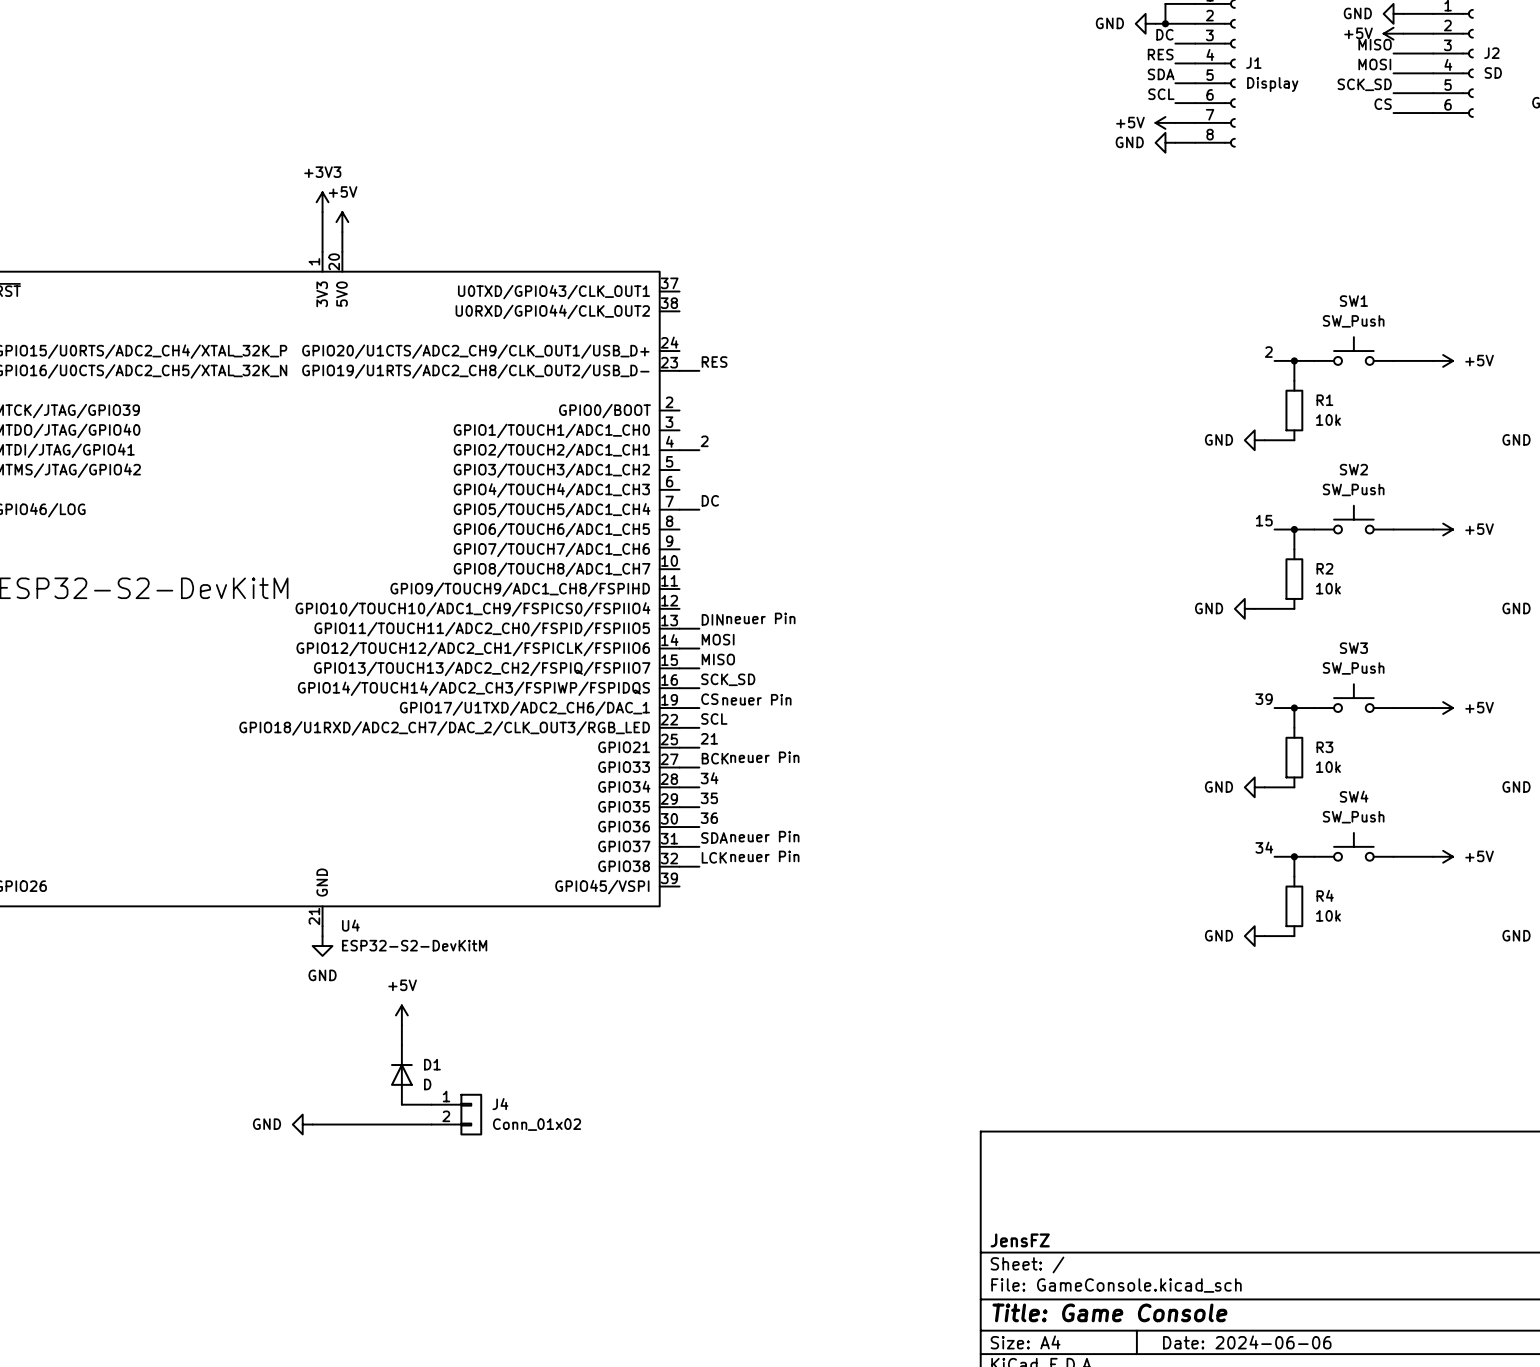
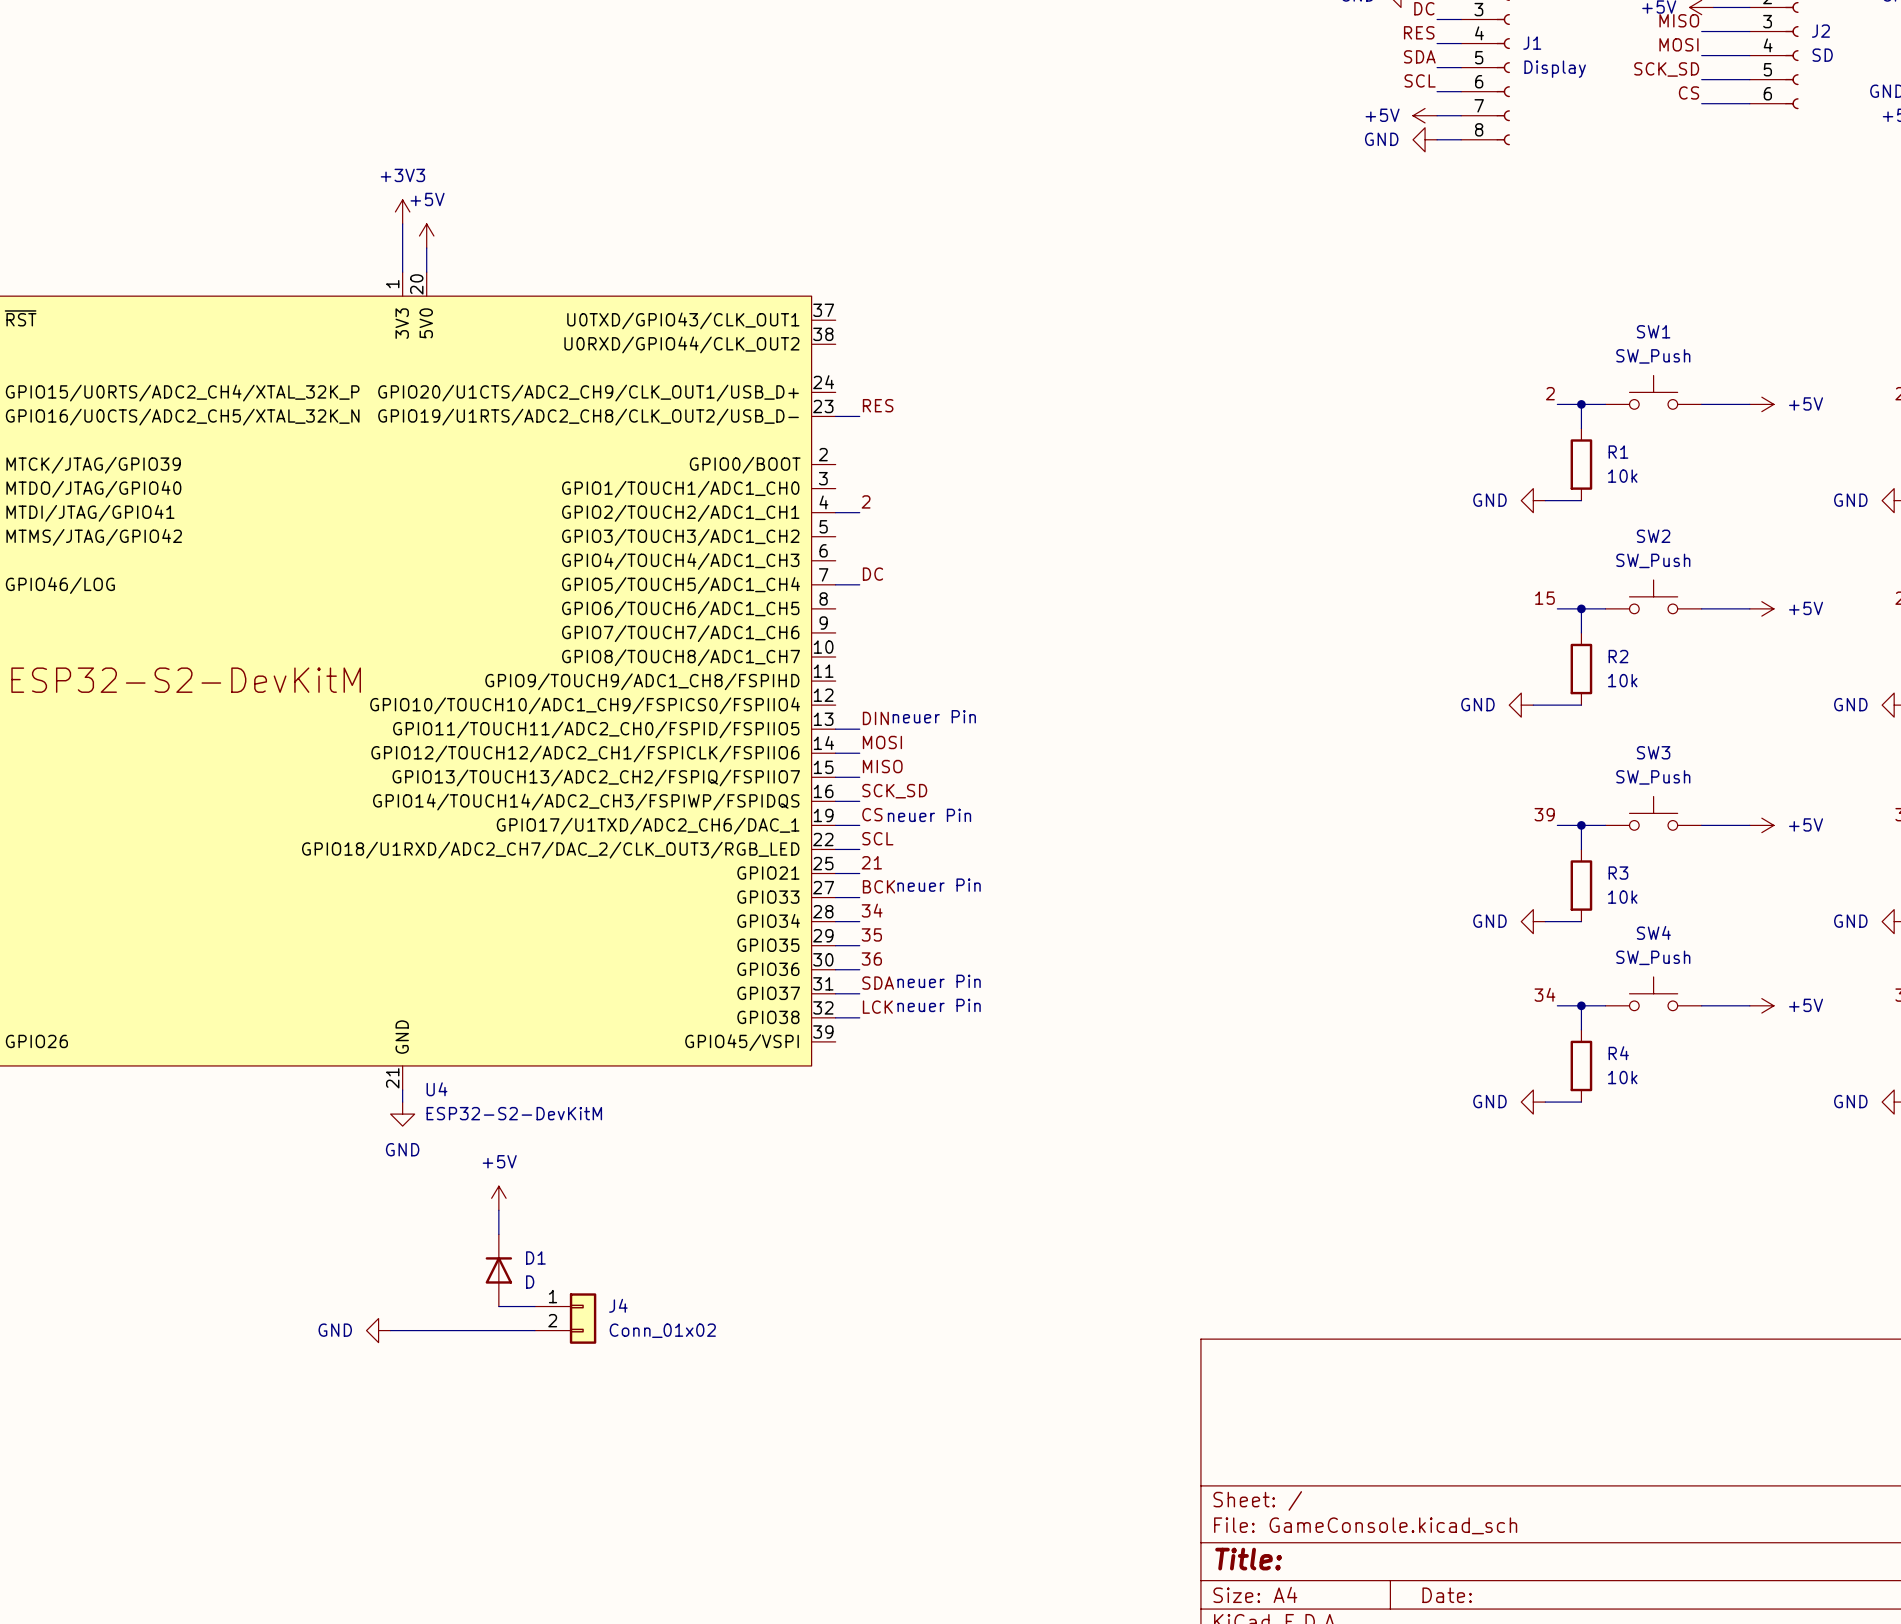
title block: JensFZ (1020, 1240) -> none
title block: Title: Game Console (1109, 1312) -> Title: (1248, 1559)
title block: Date: 2024-06-06 (1247, 1342) -> Date: (1447, 1595)

